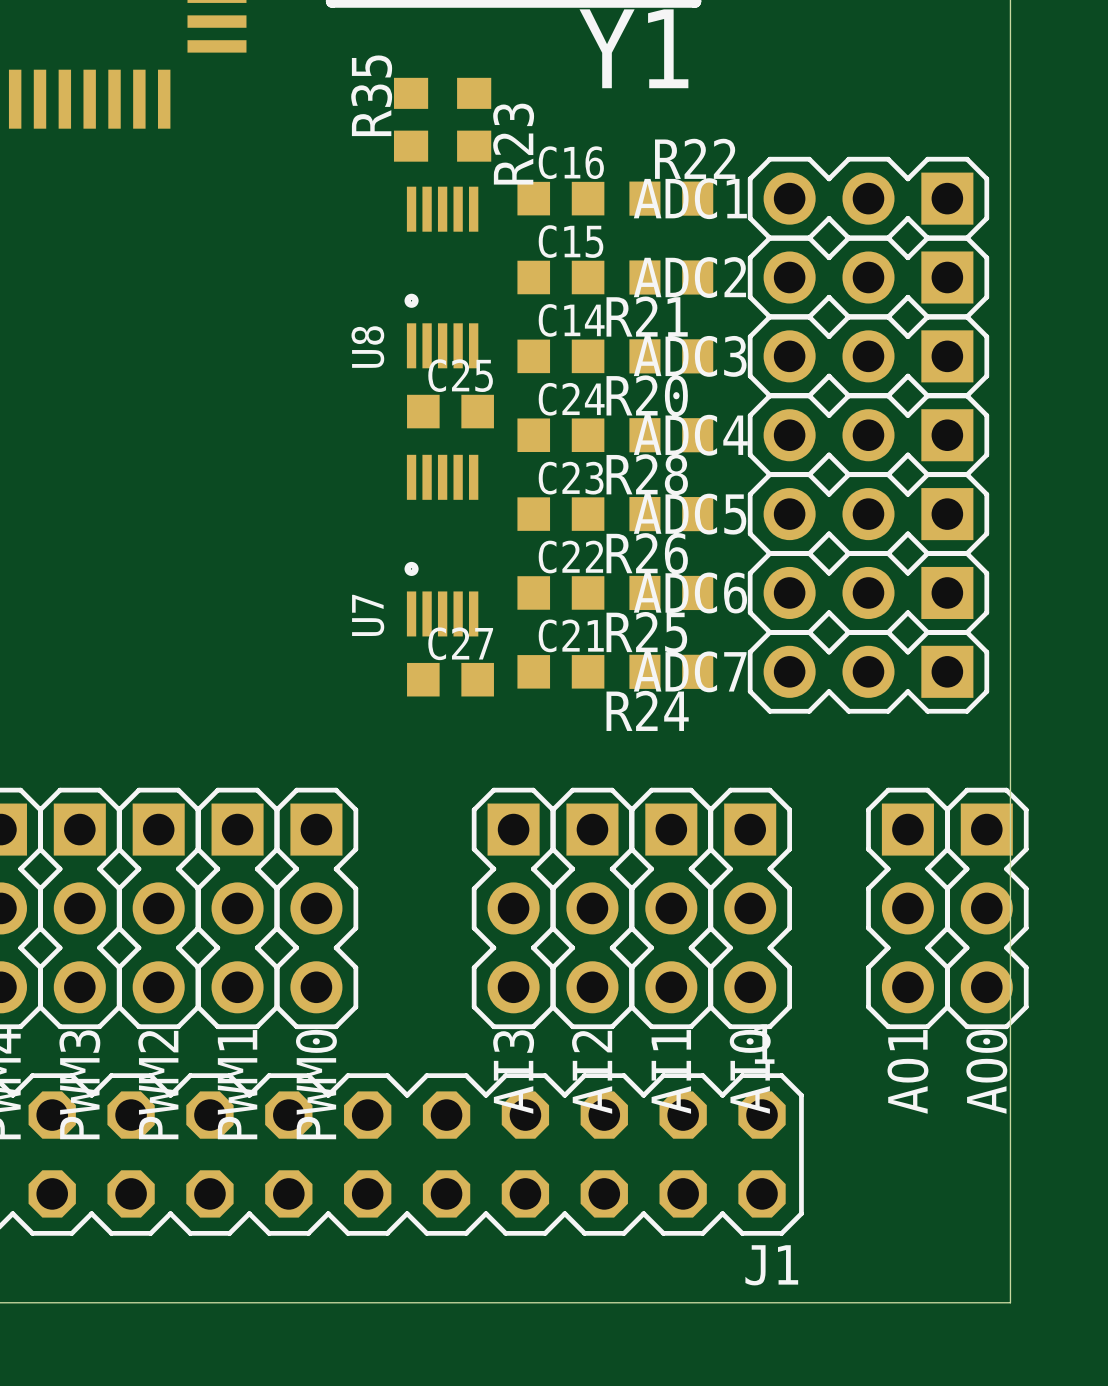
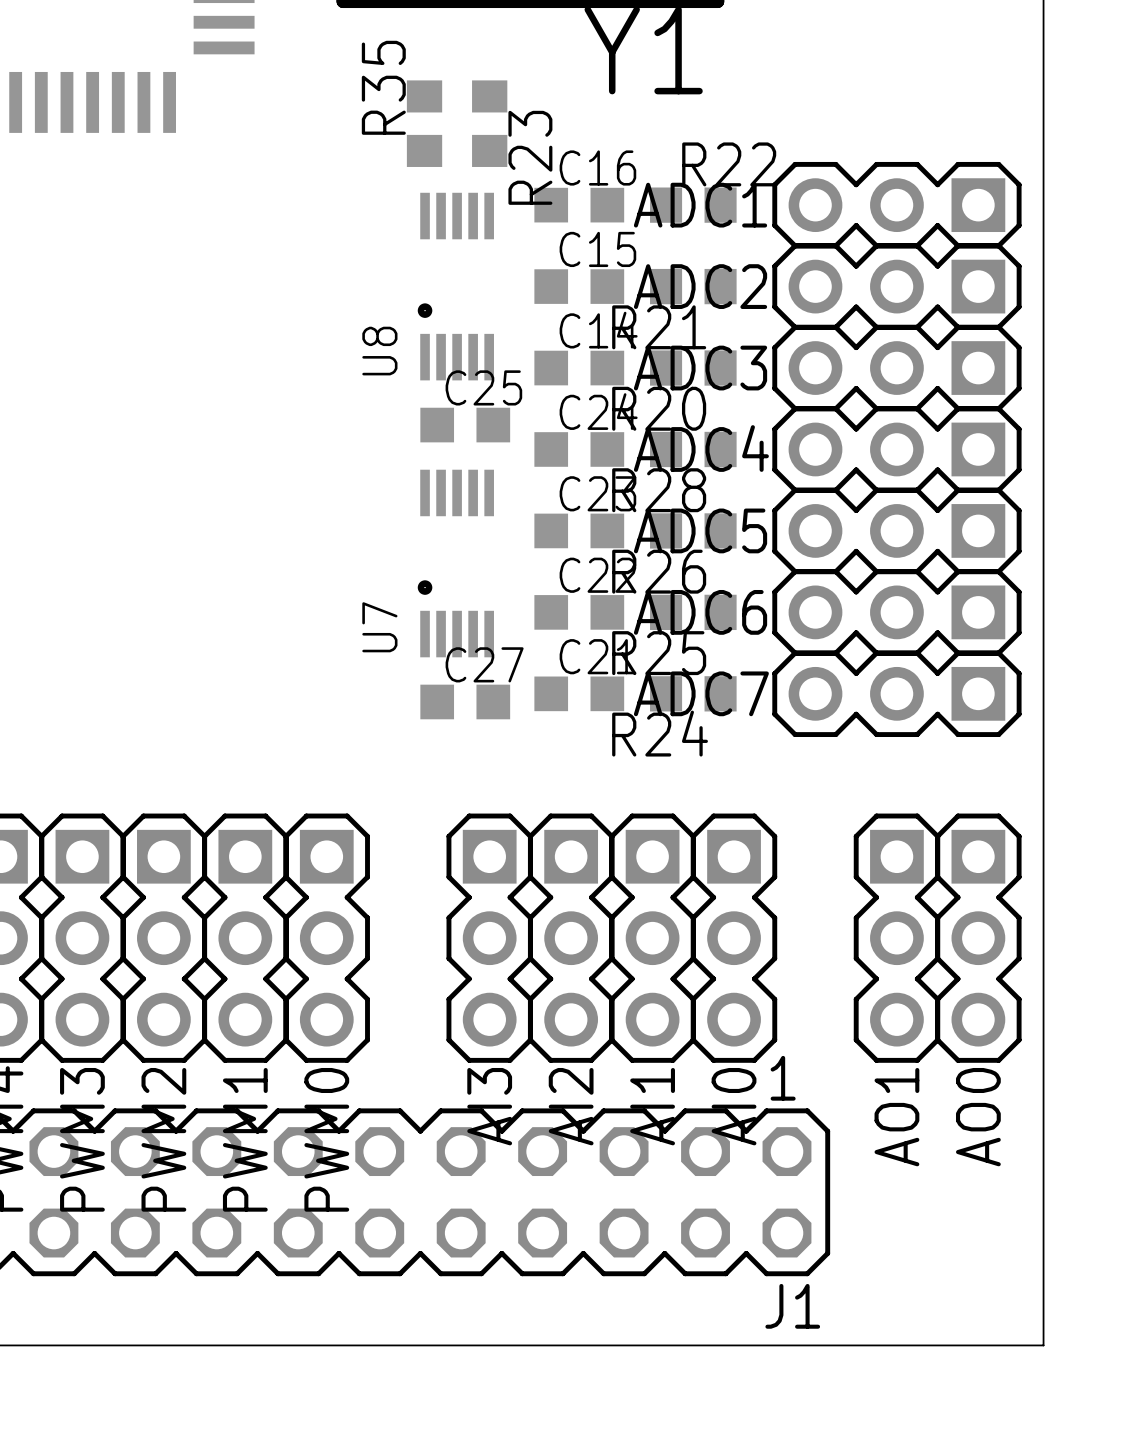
part position: (513, 908) -> (489, 938)
part position: (592, 908) -> (571, 938)
part position: (671, 908) -> (652, 938)
part position: (750, 908) -> (734, 938)
part position: (907, 908) -> (896, 938)
part position: (986, 908) -> (978, 938)

